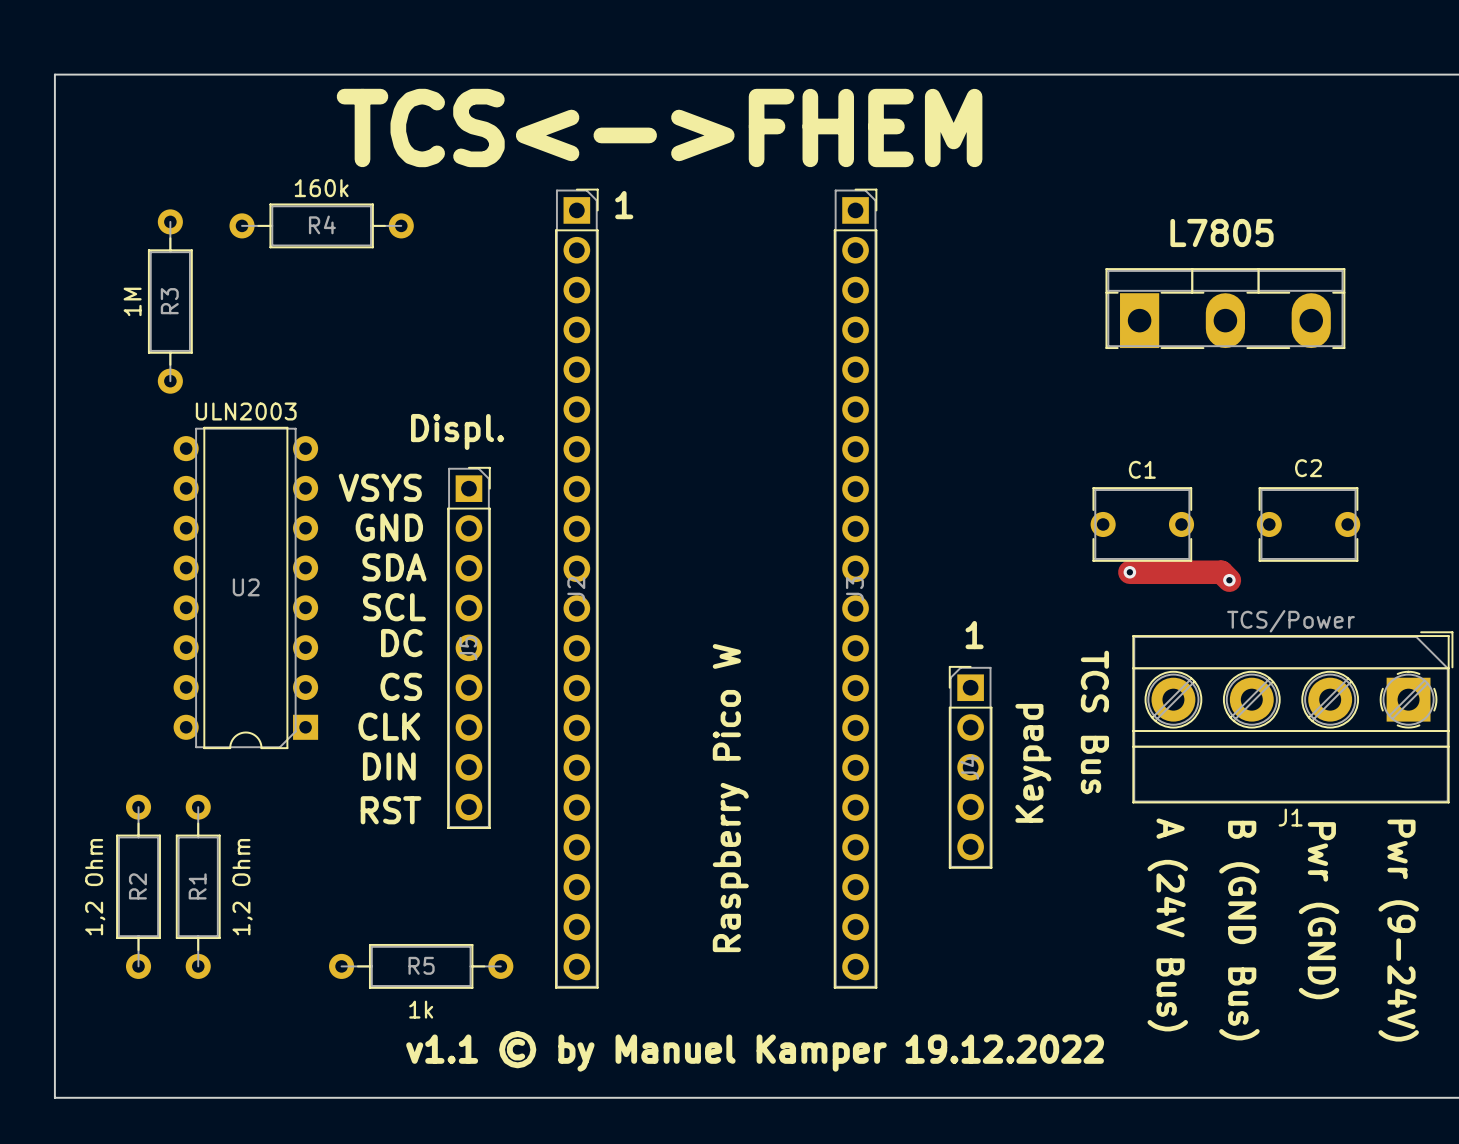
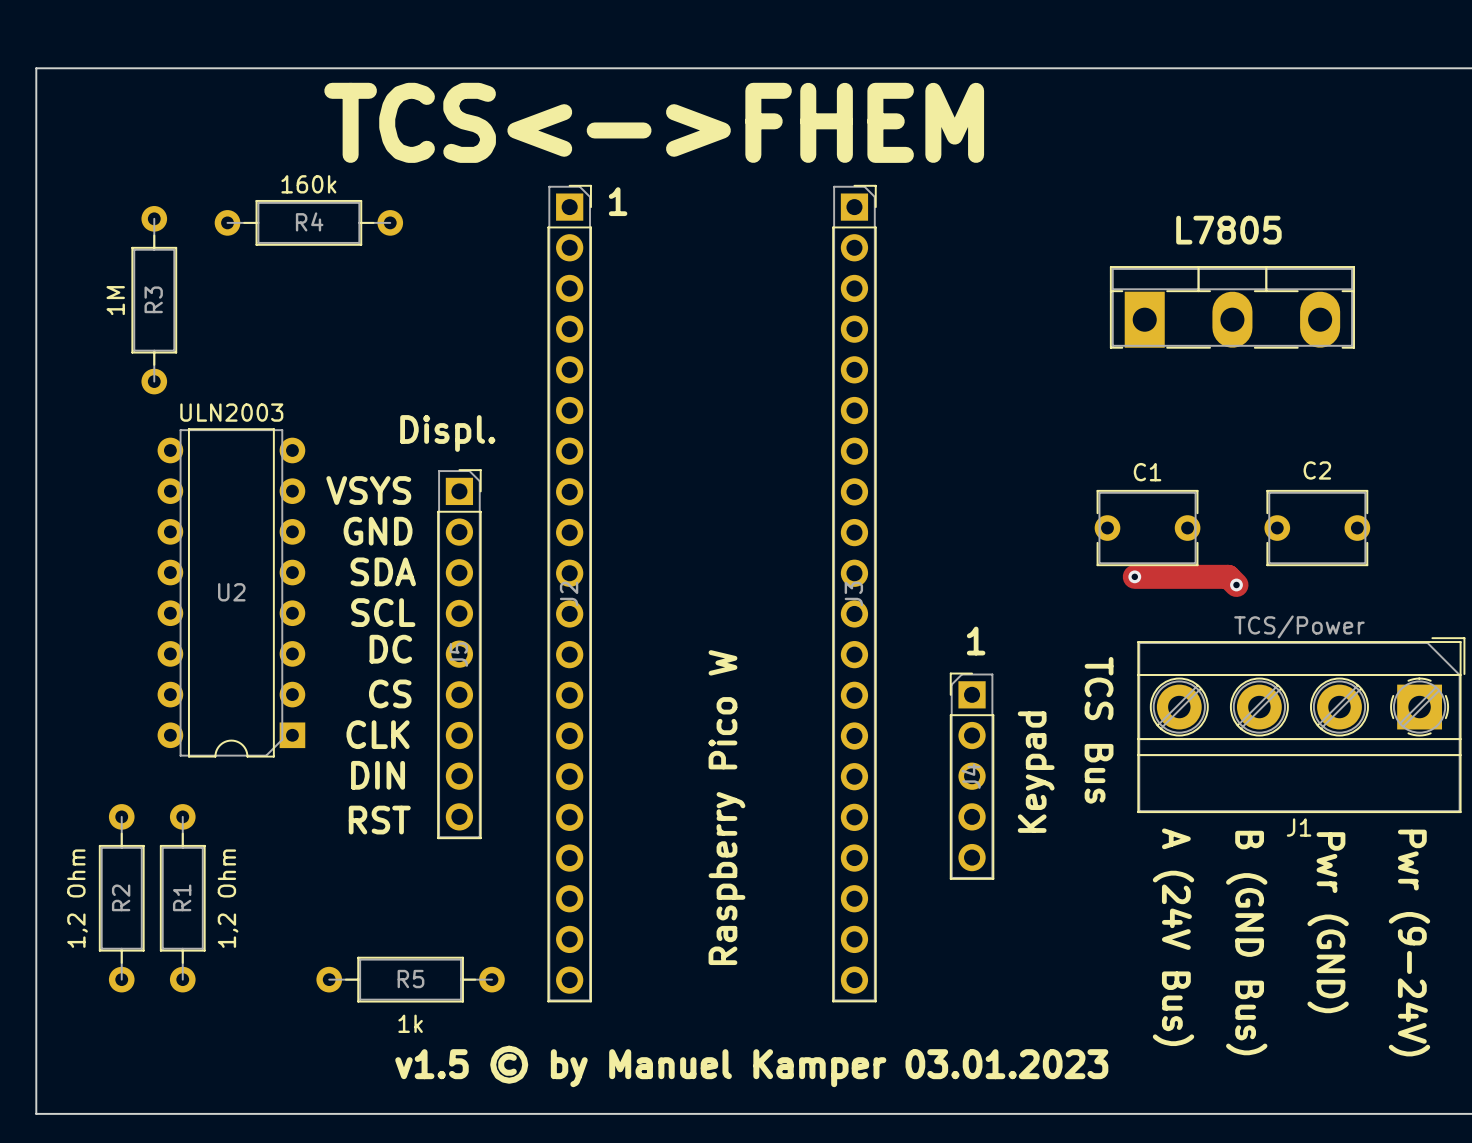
text: v1.1 © by Manuel Kamper 19.12.2022 (755, 1051) -> v1.5 © by Manuel Kamper 03.01.2023 (751, 1066)

